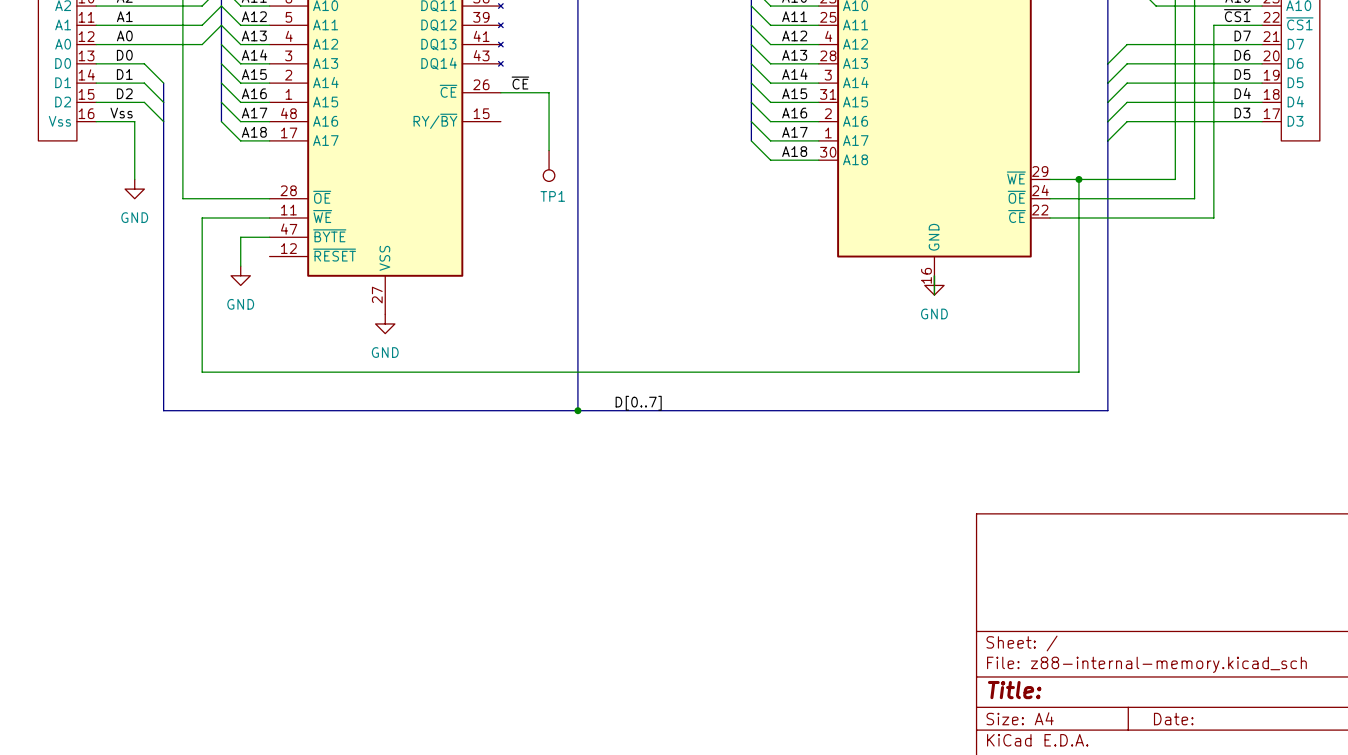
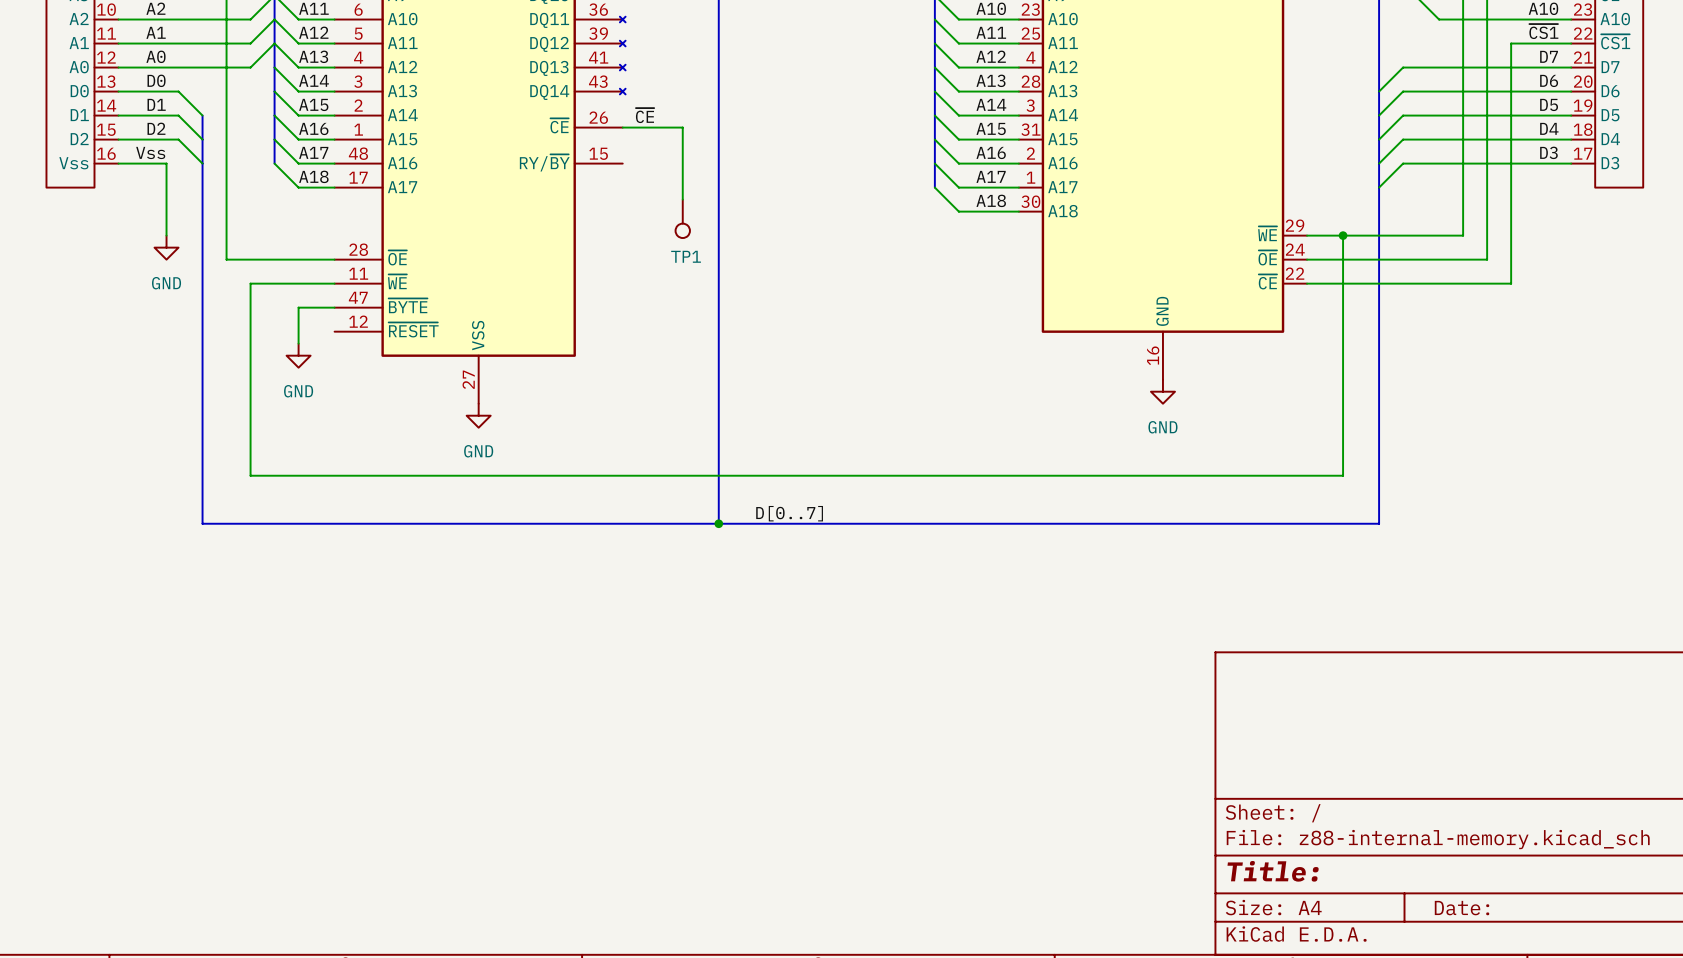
power symbol position: GND (934, 285) -> GND (1162, 391)

